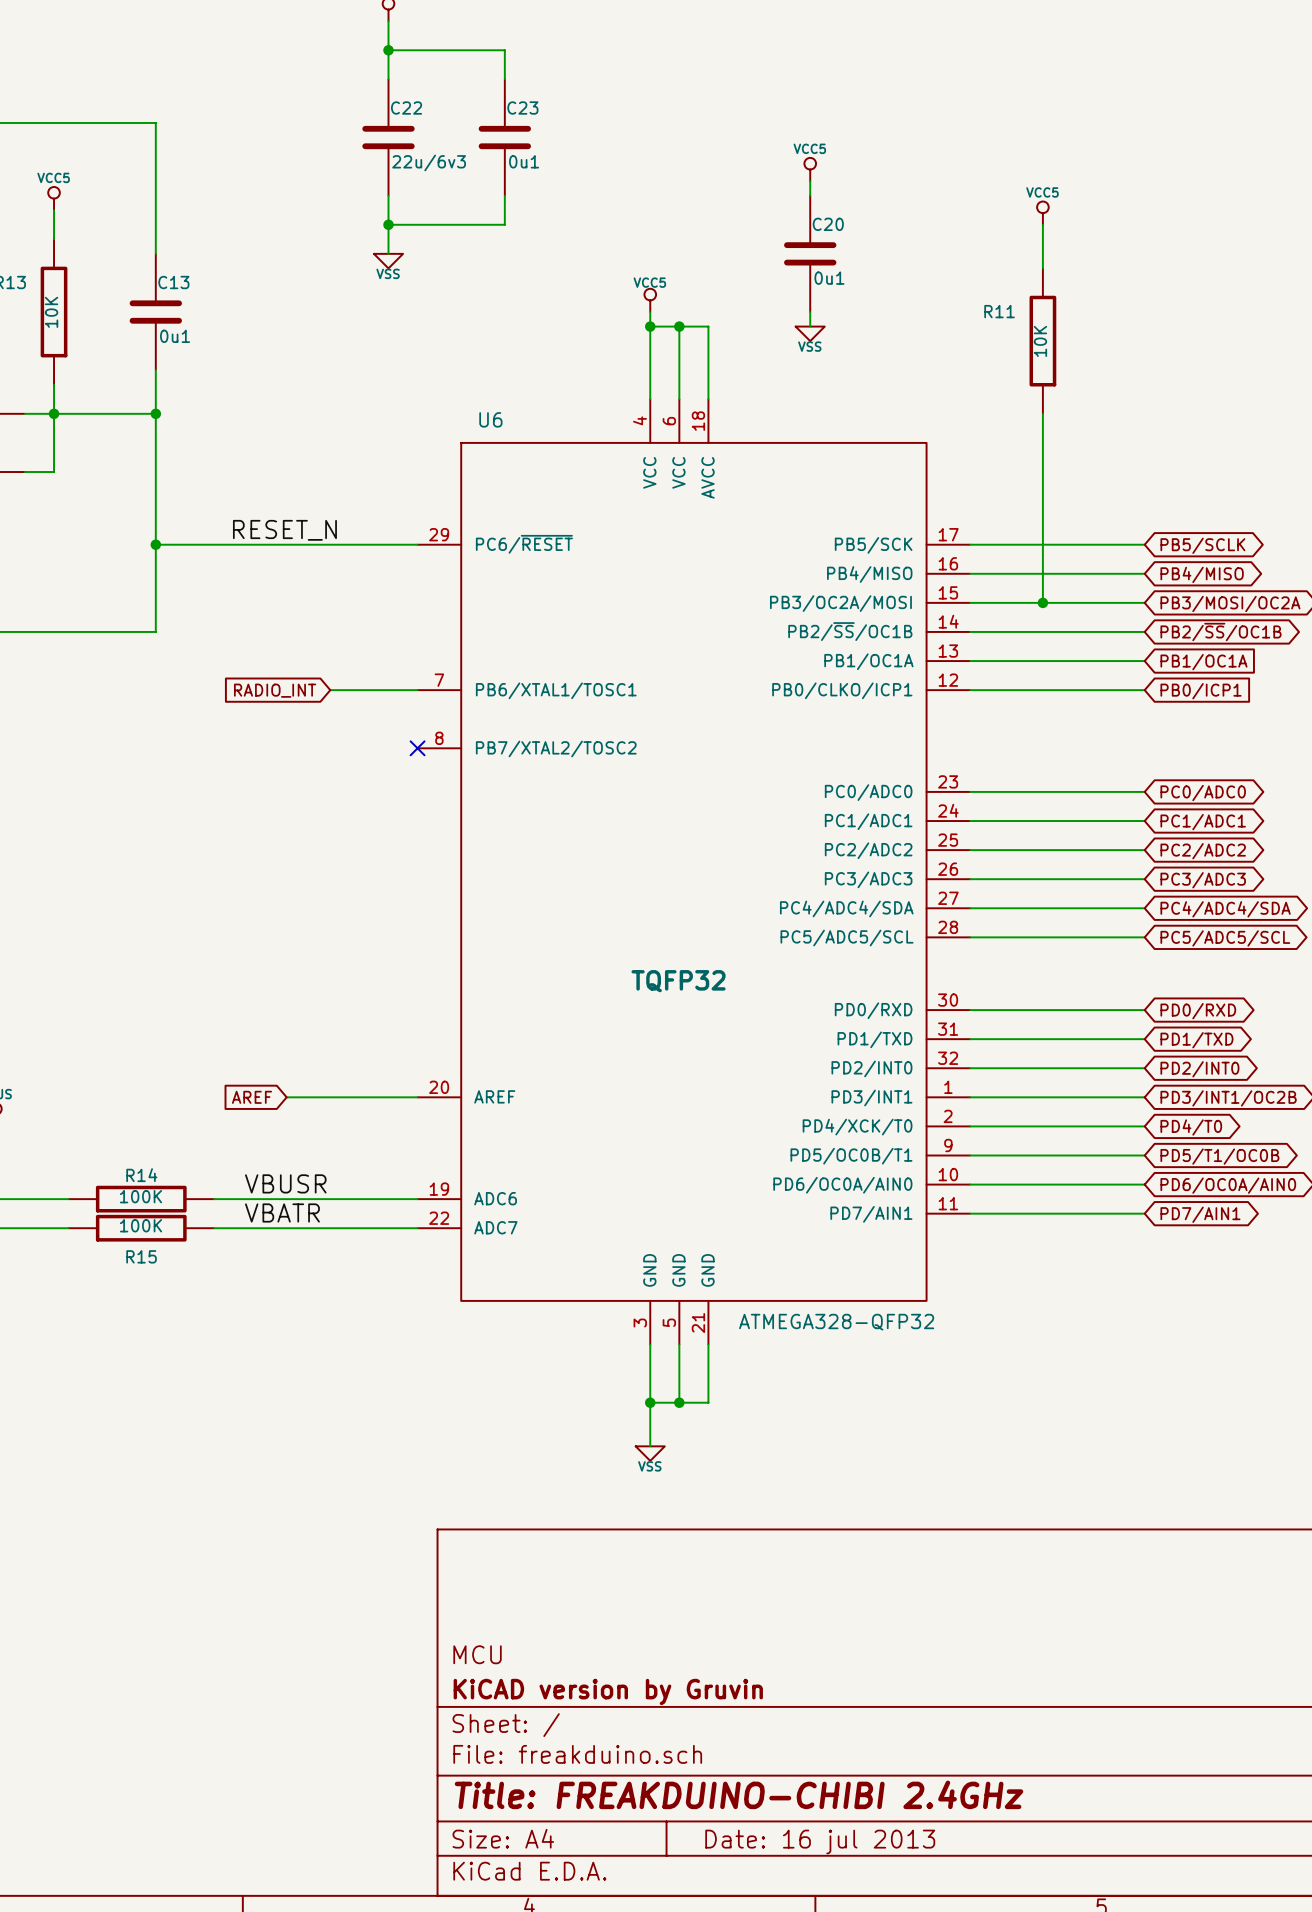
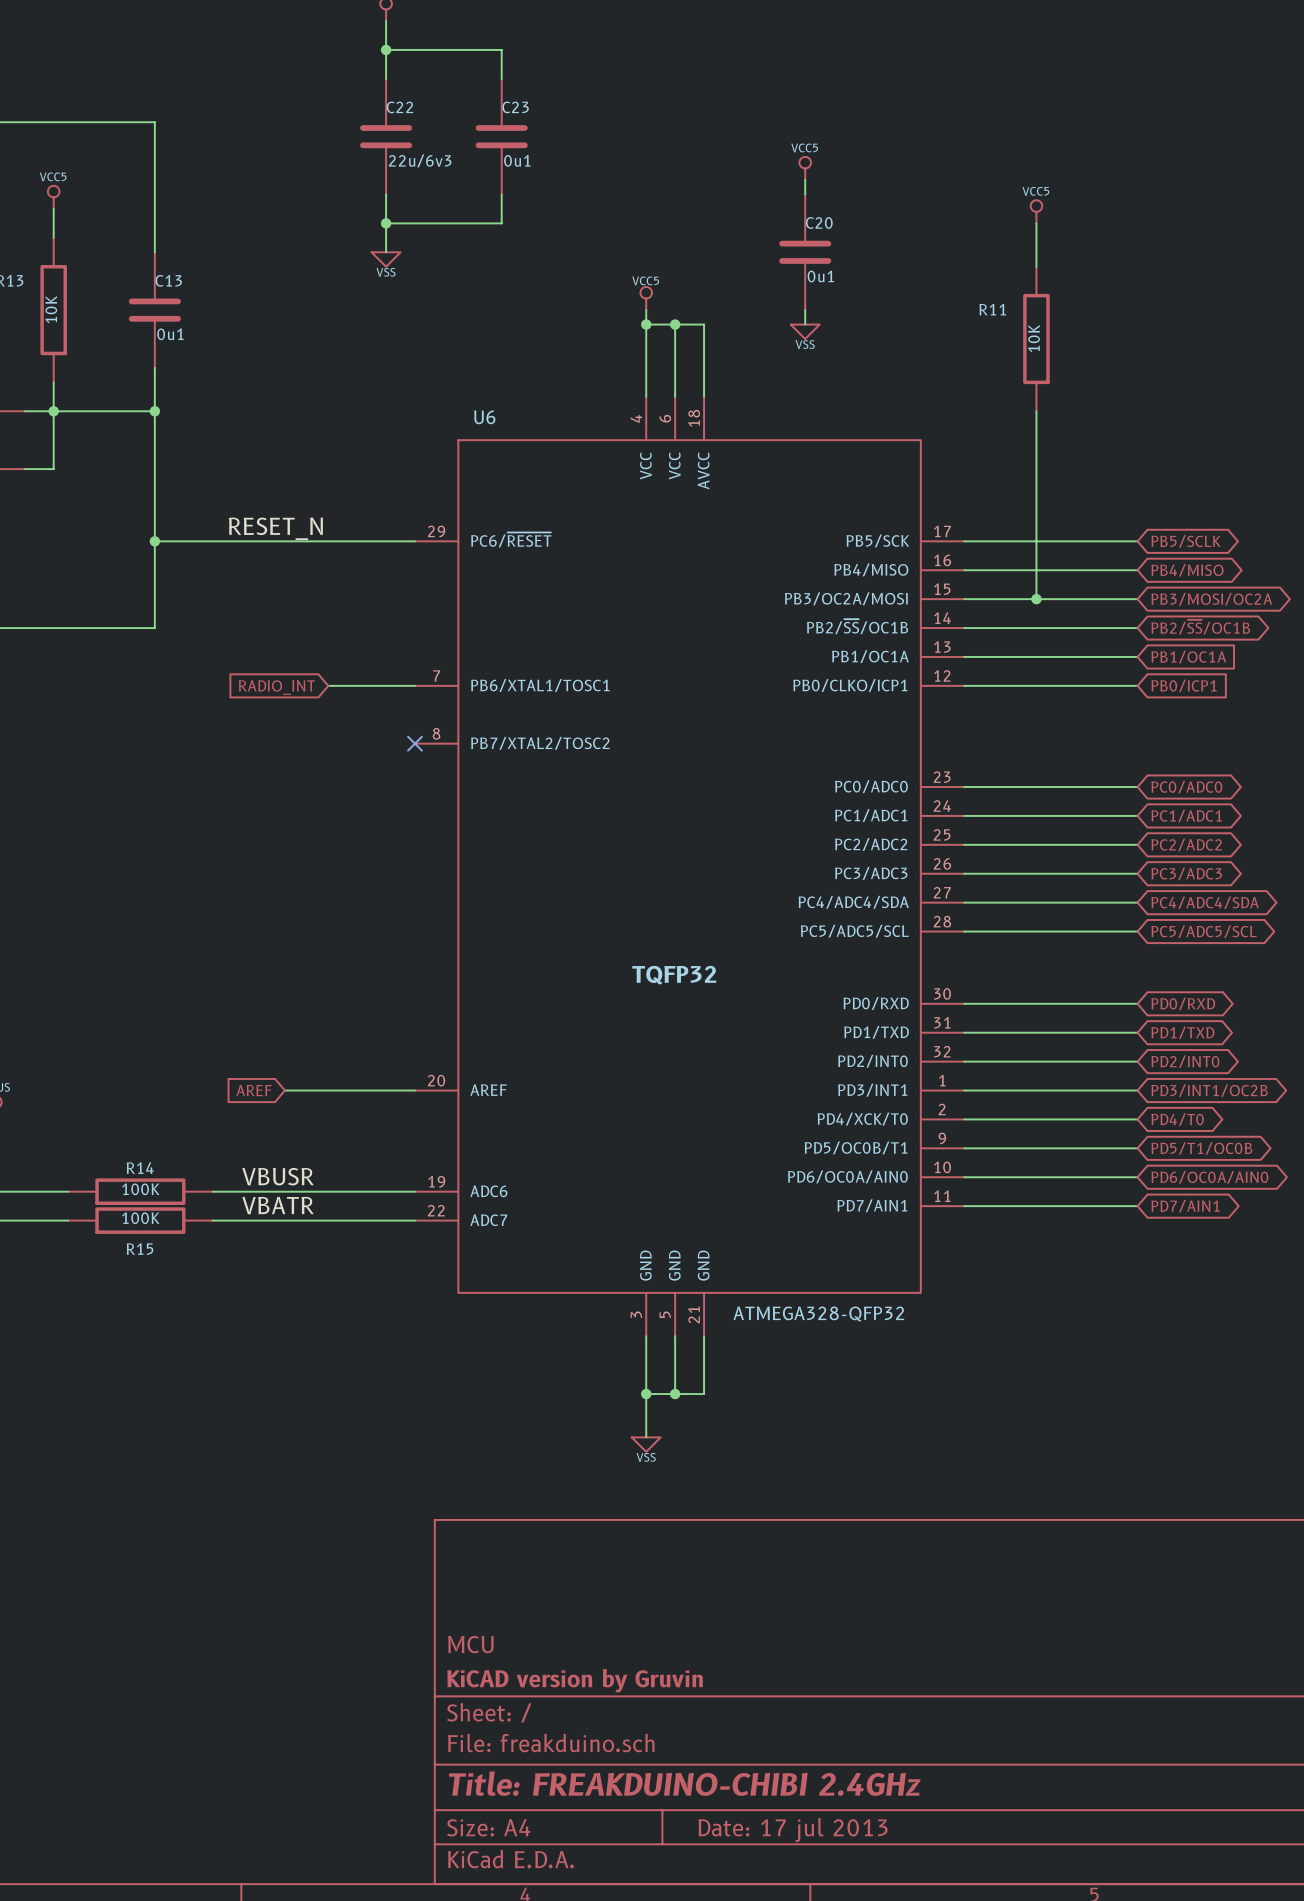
title block: Date: 16 jul 2013 (820, 1841) -> Date: 17 jul 2013 (793, 1830)

